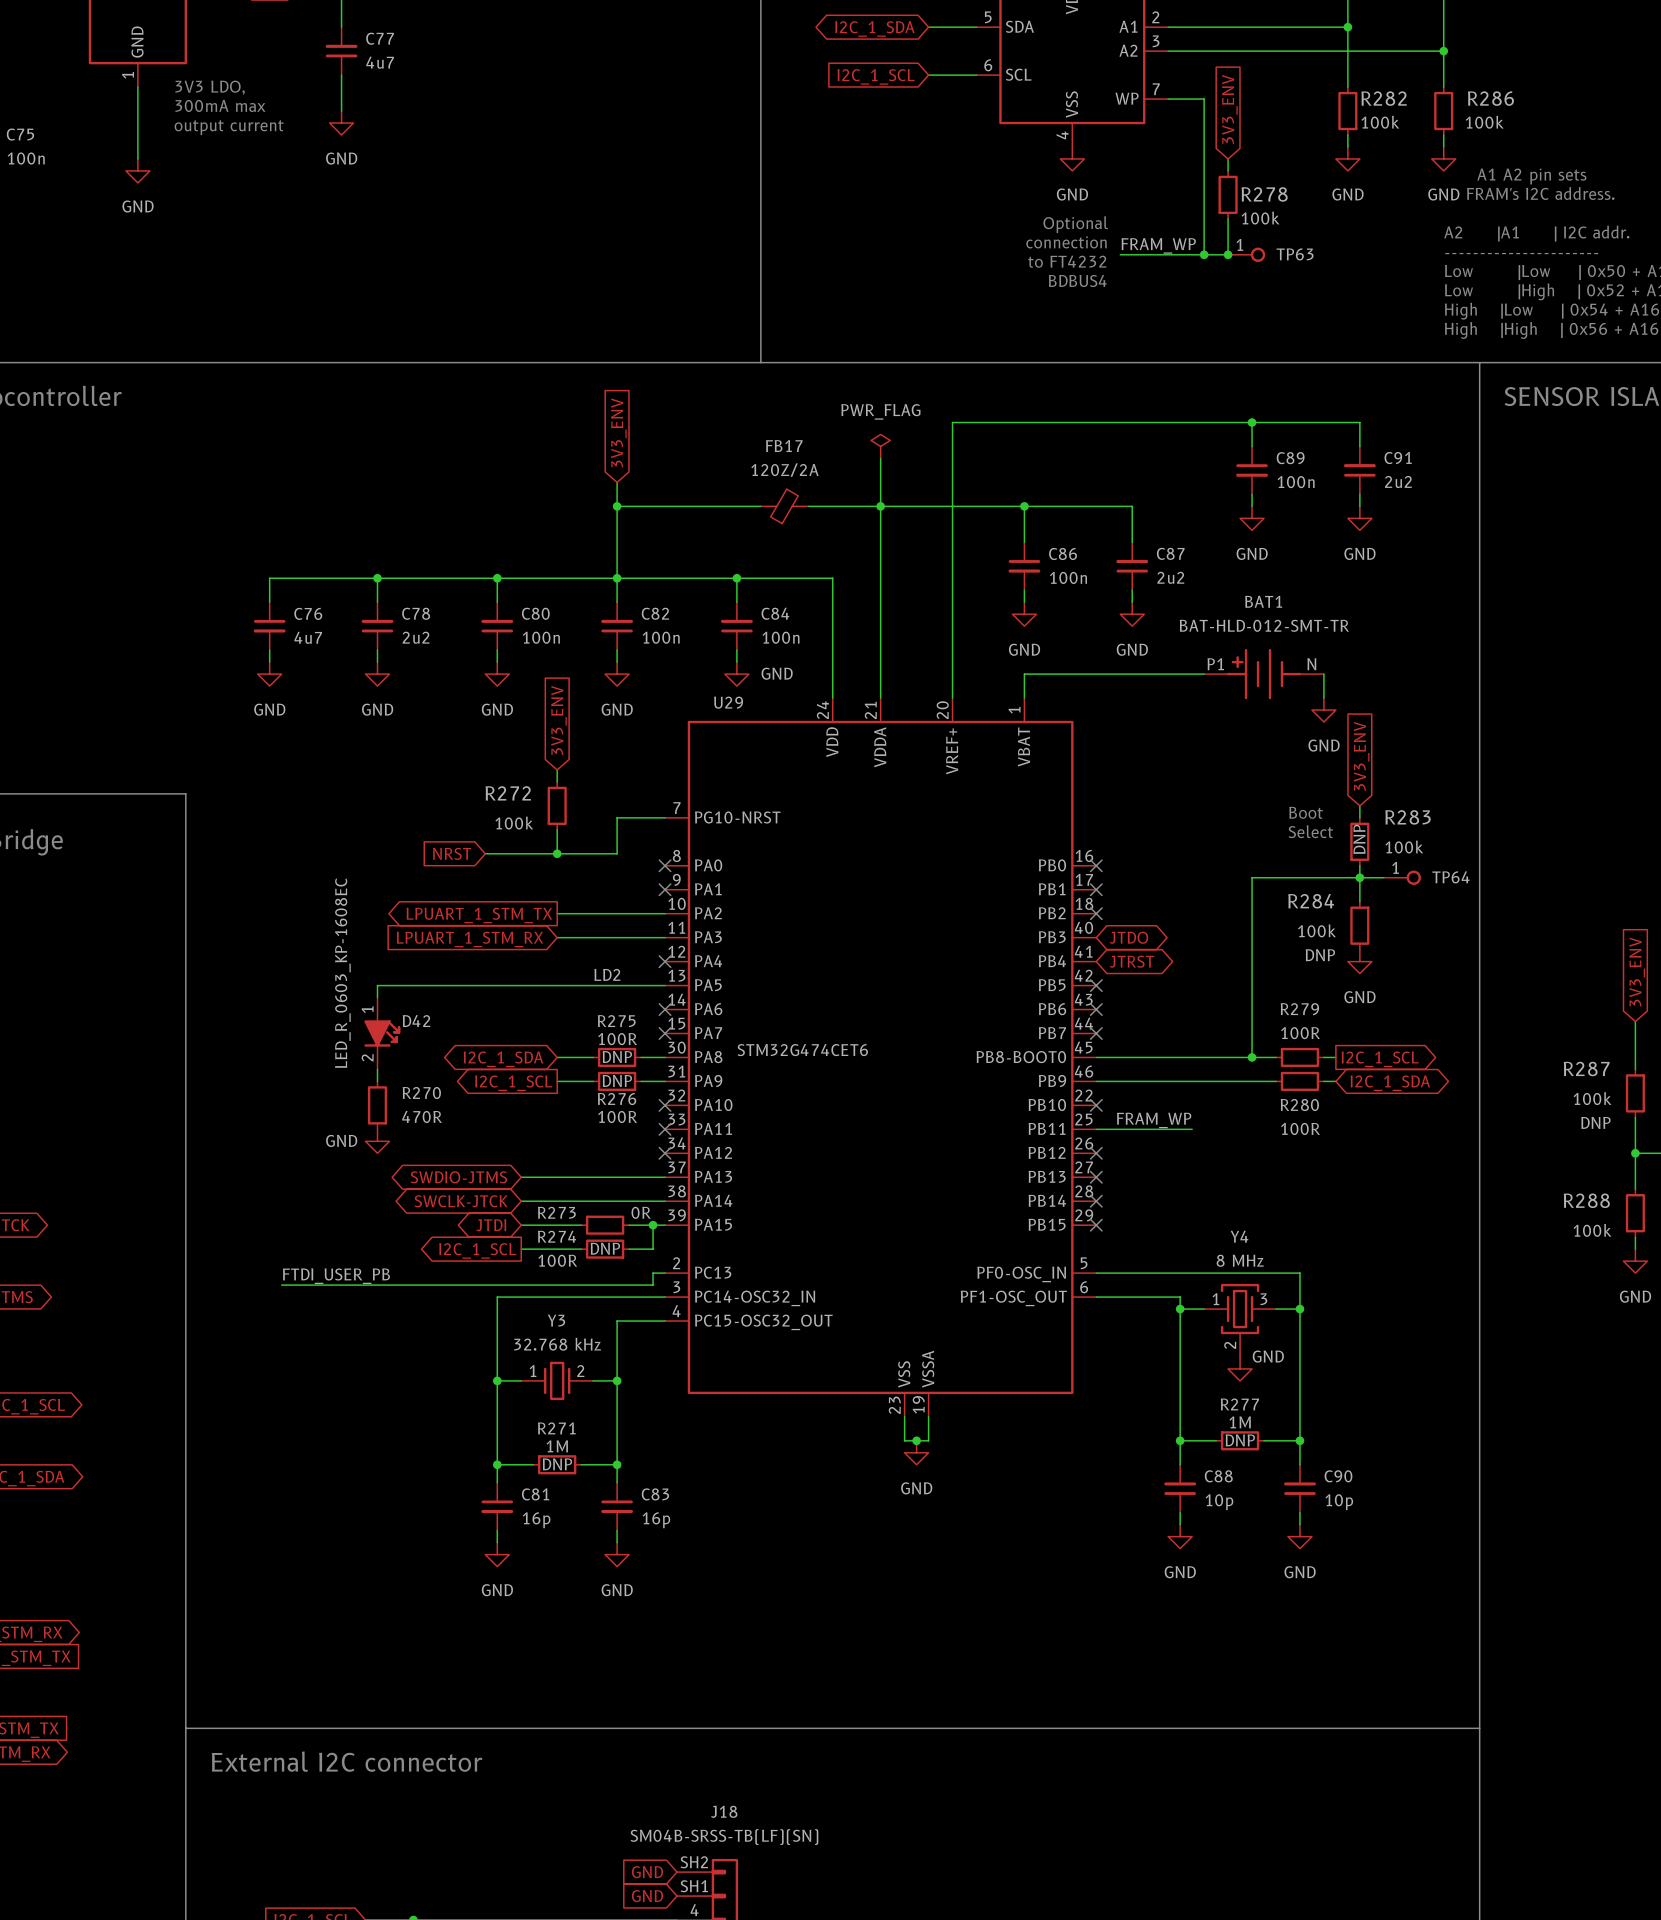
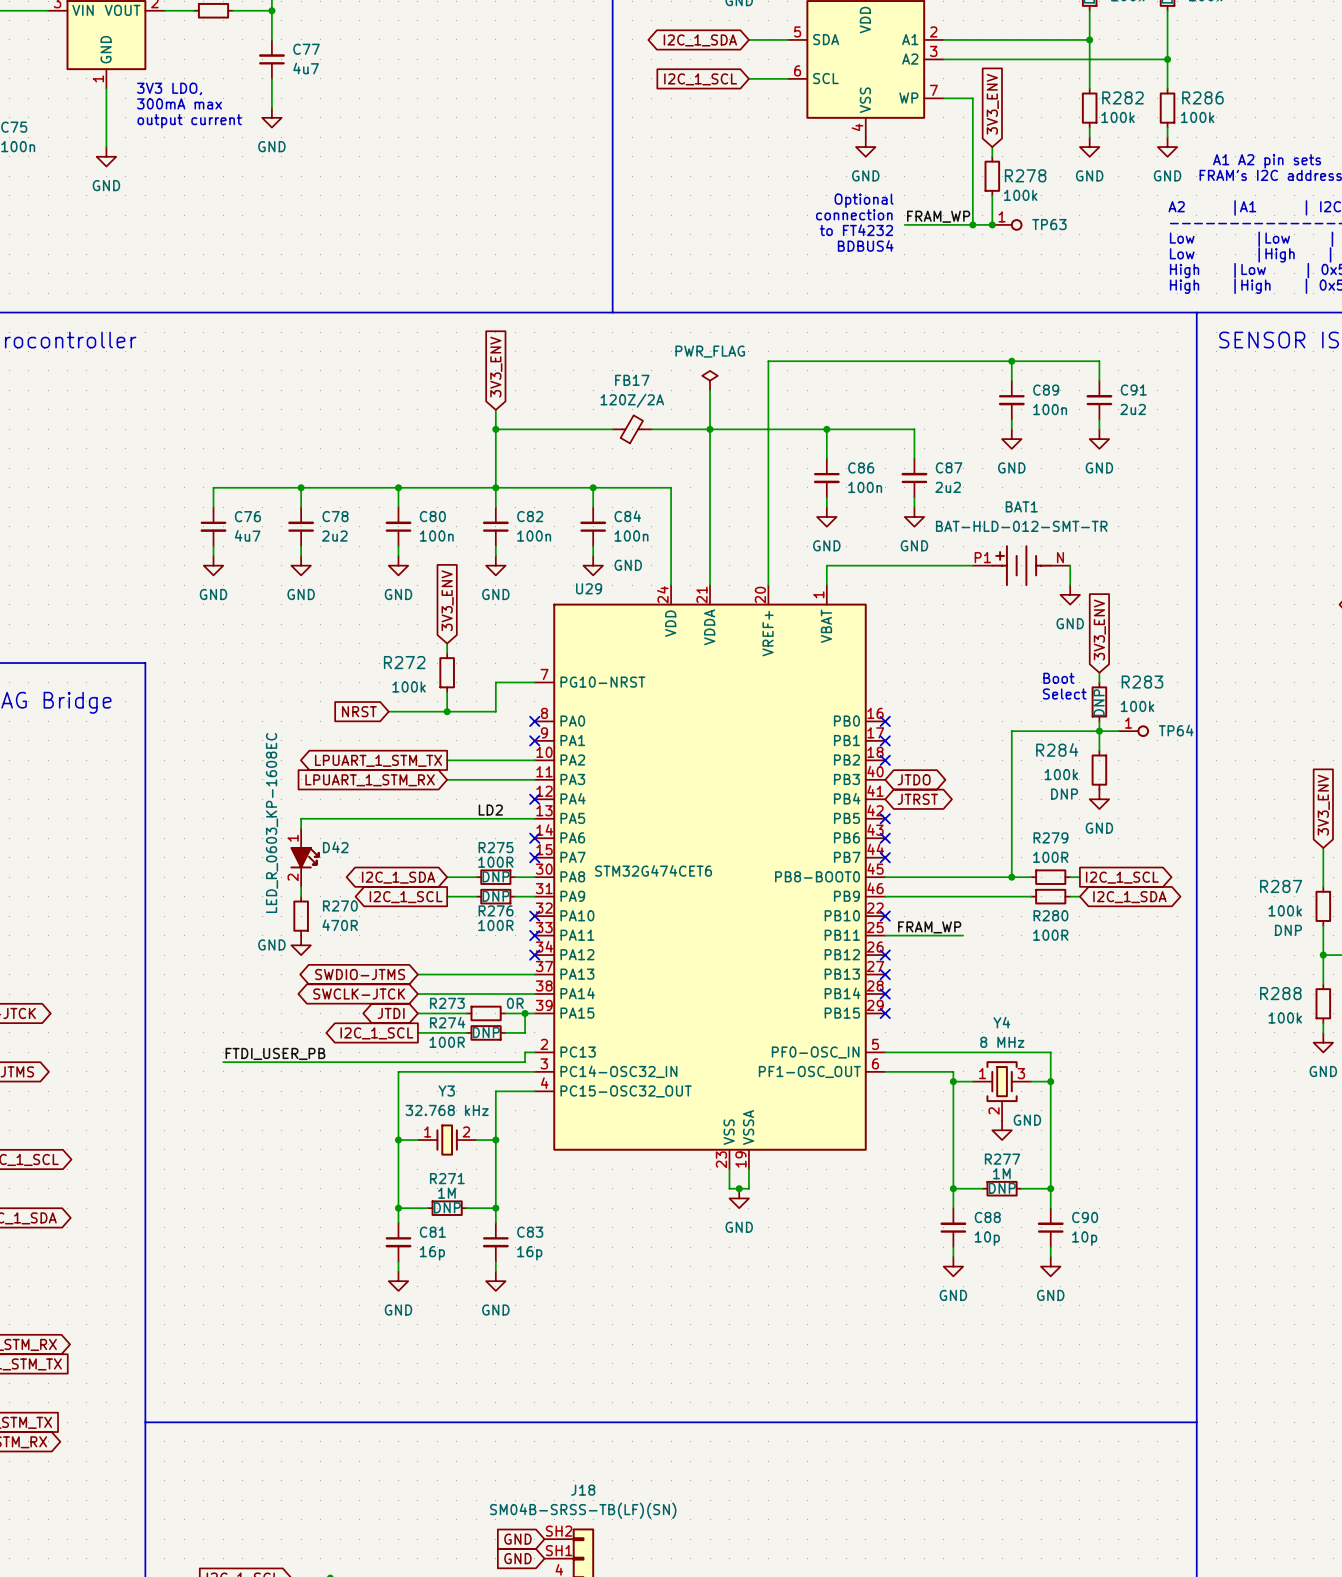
text: External I2C connector (346, 1761) -> none

